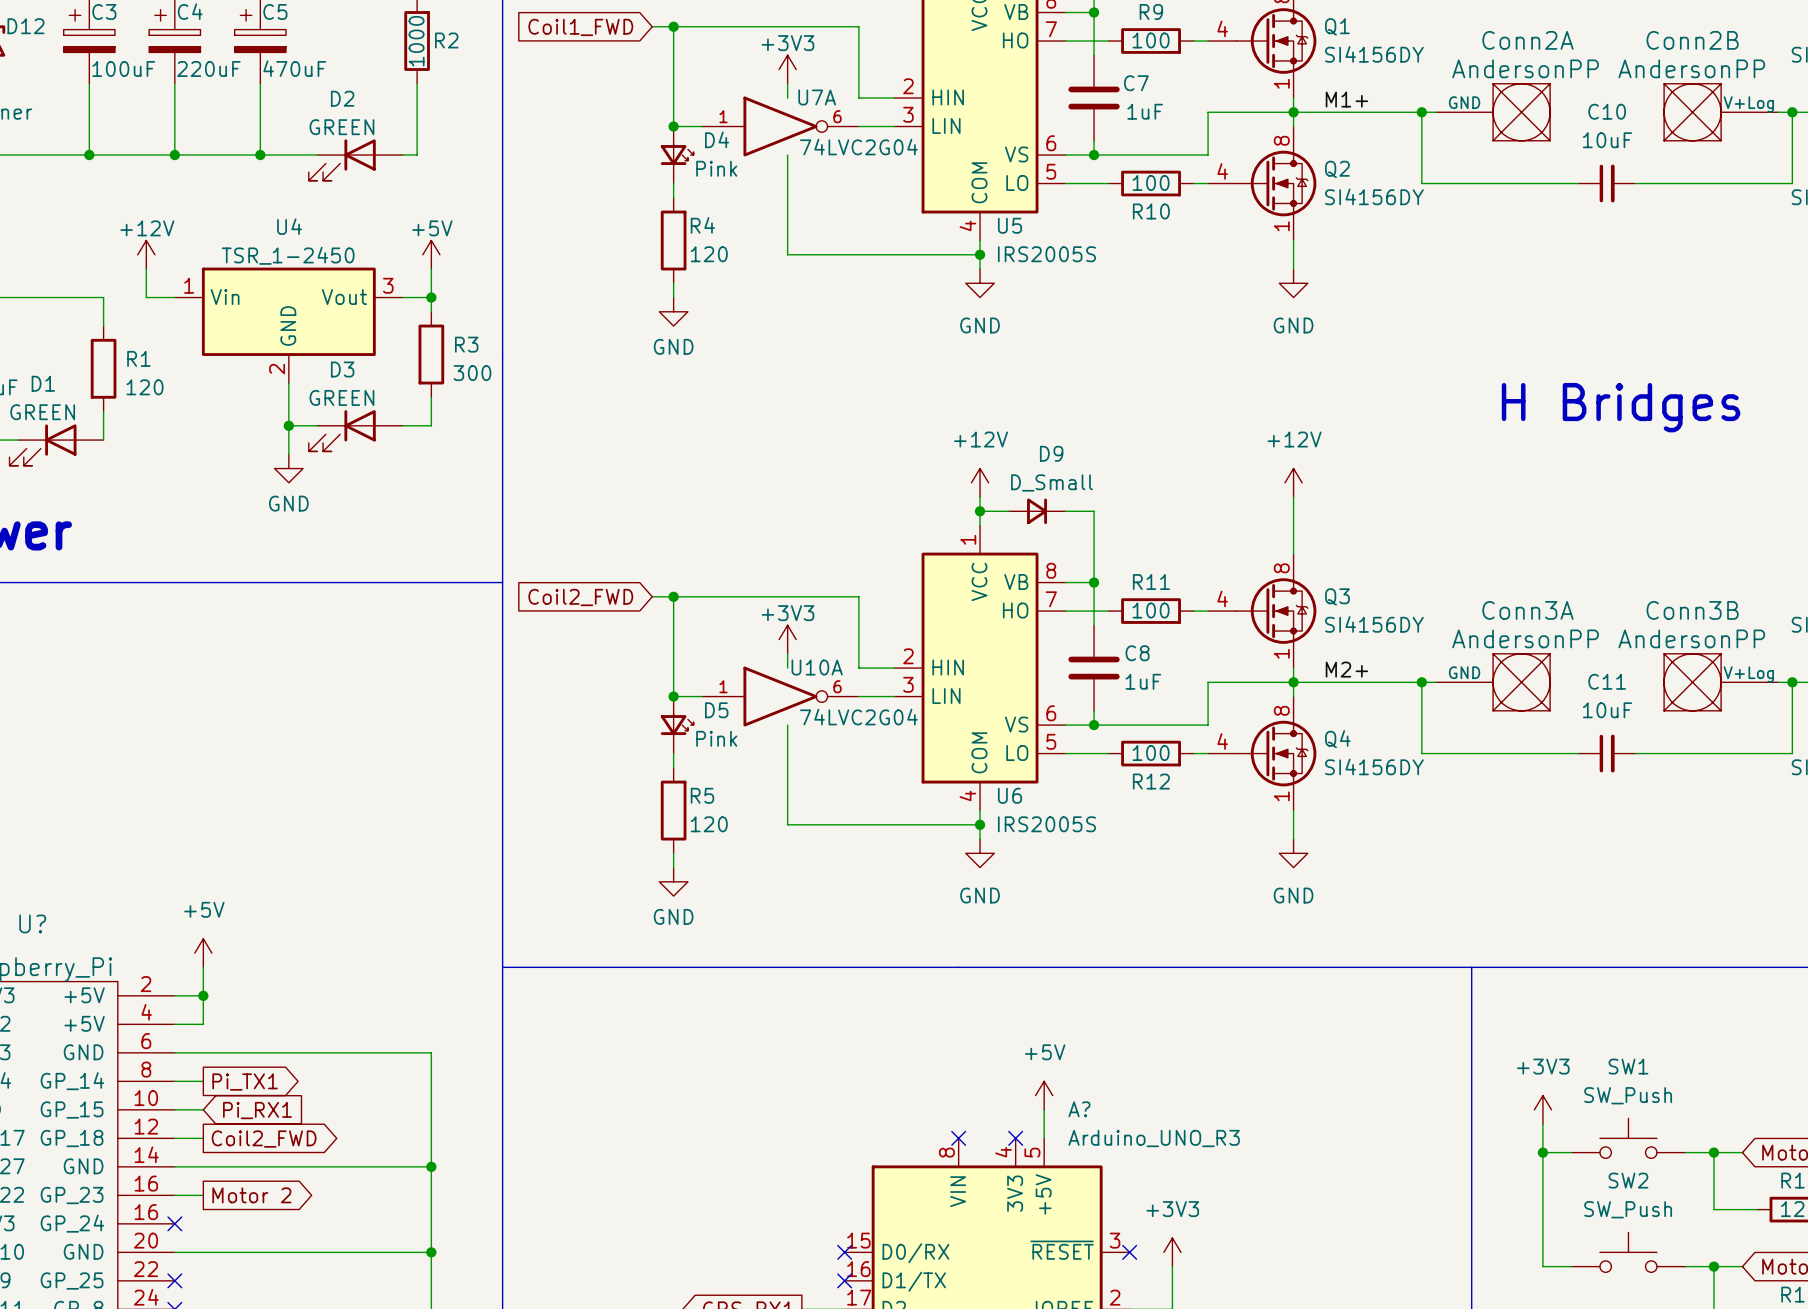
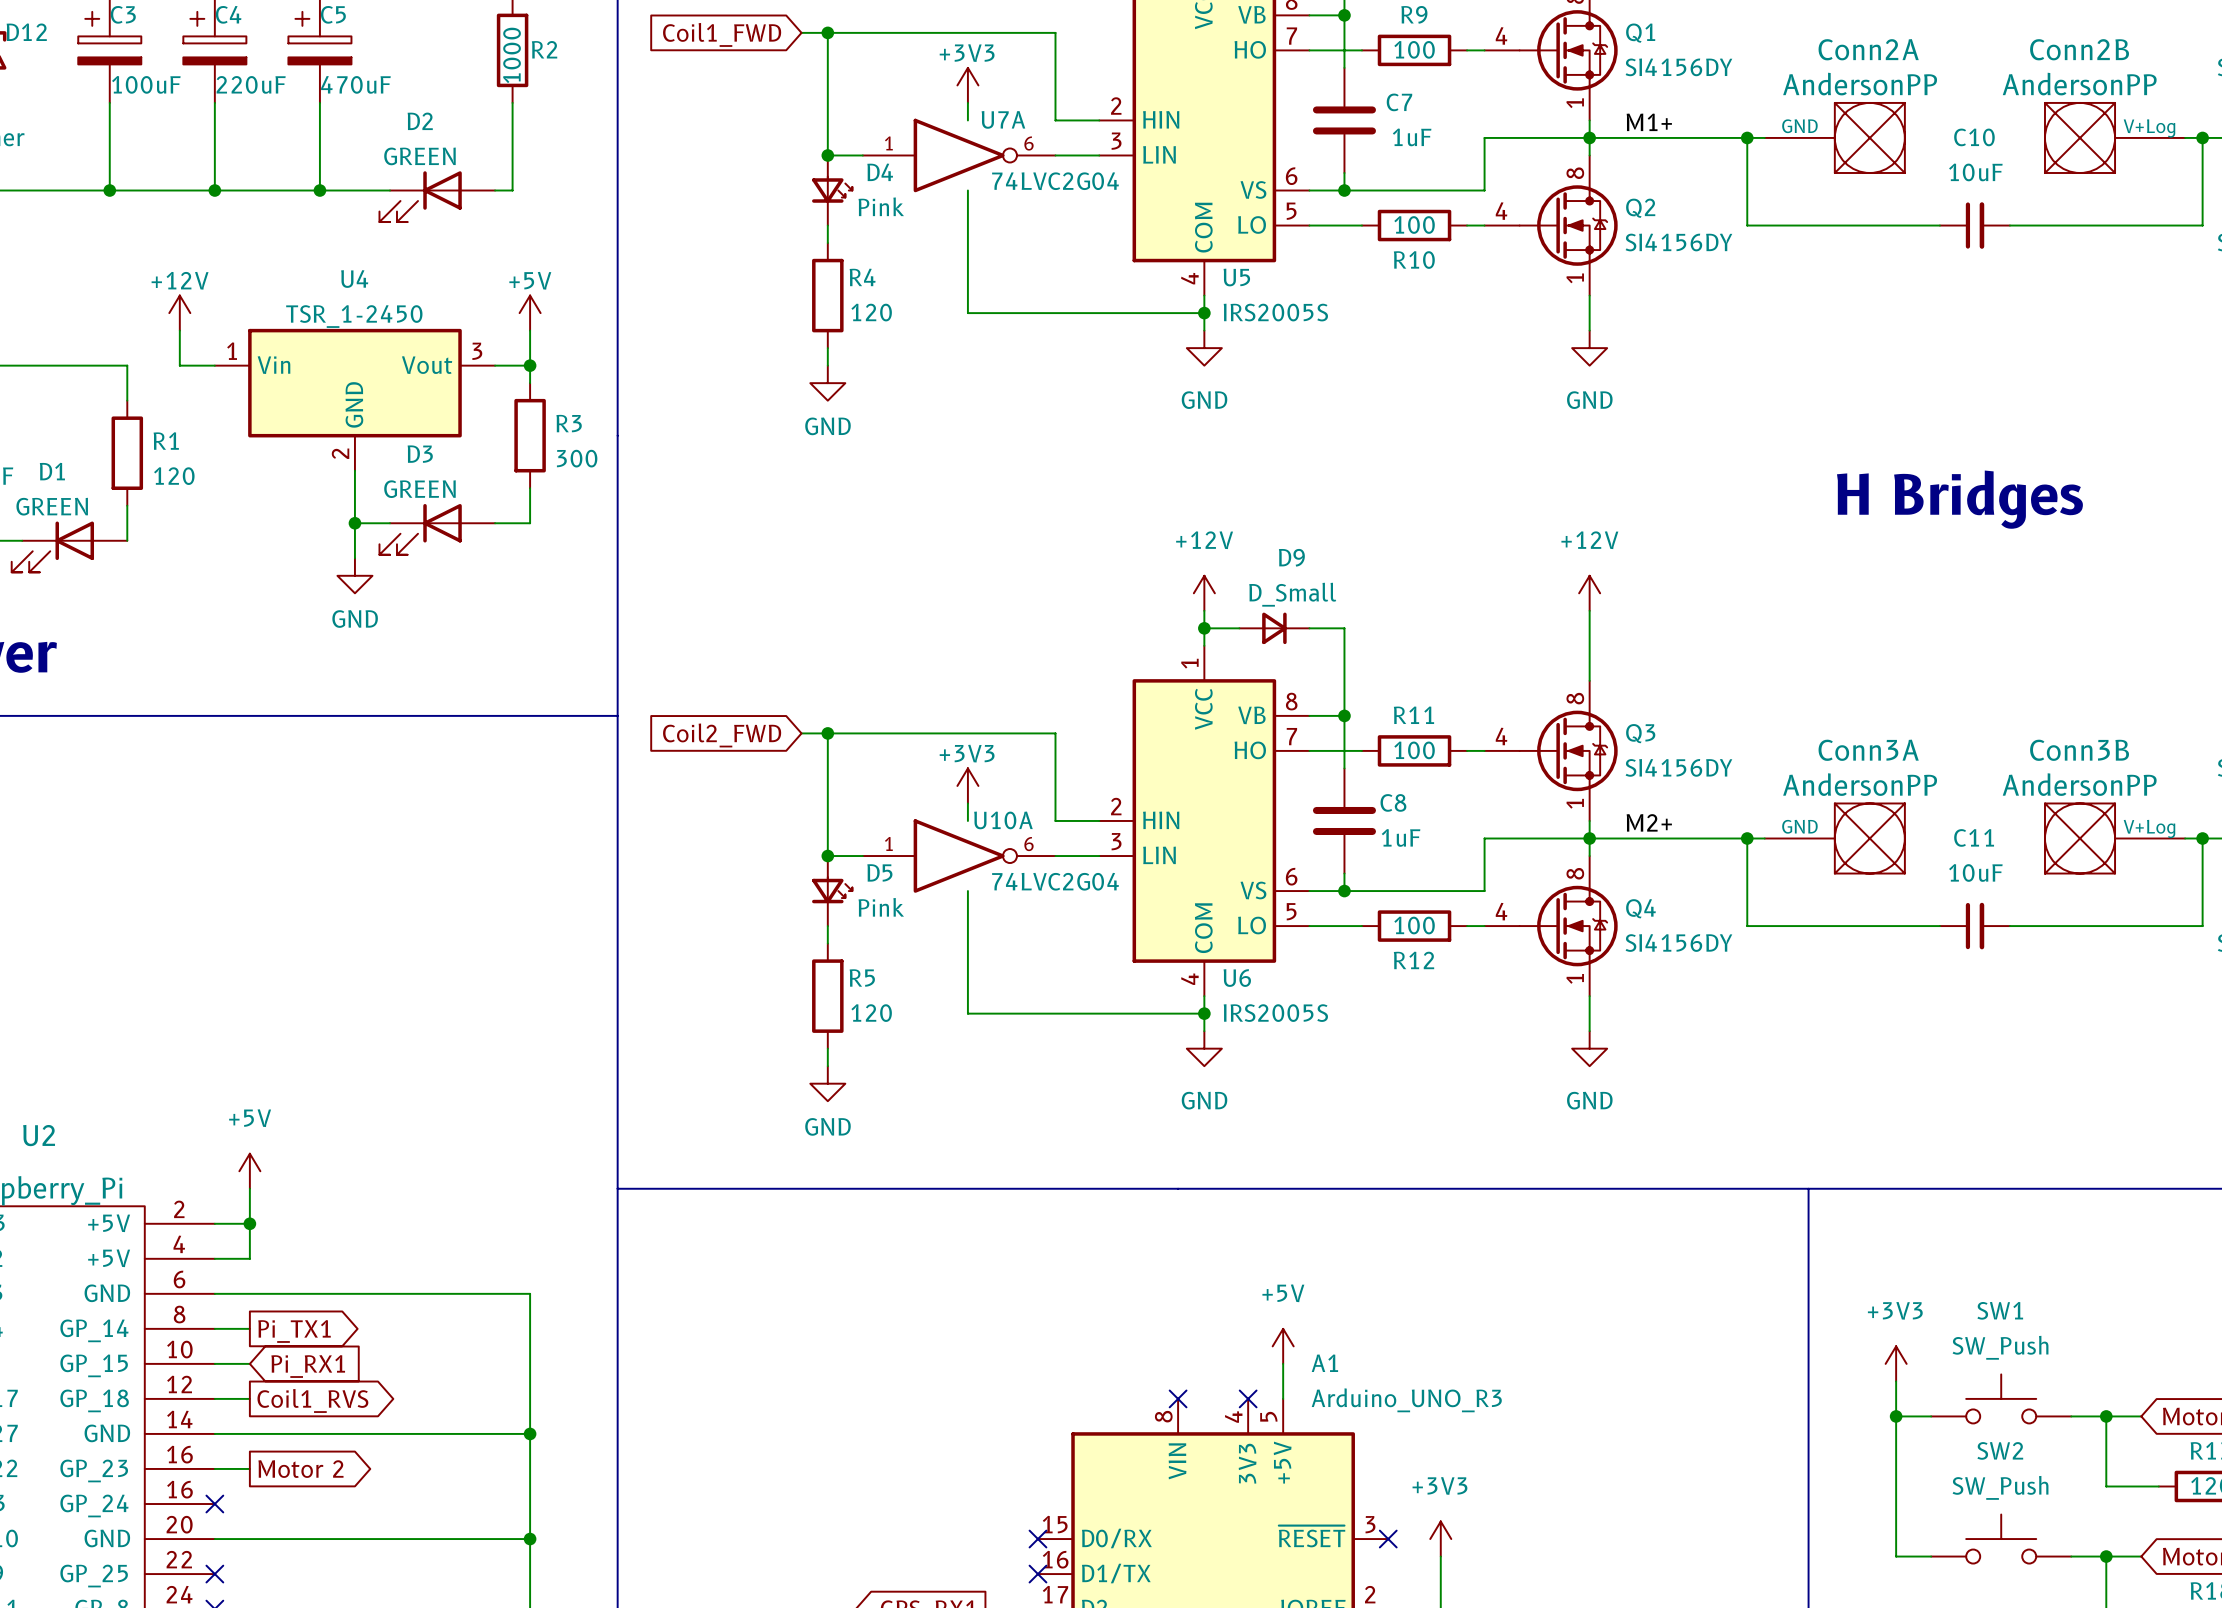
U? name: U? (32, 923) -> U2 (39, 1135)
A? name: A? (1079, 1109) -> A1 (1324, 1363)
global label: Coil2_FWD (264, 1139) -> Coil1_RVS (312, 1400)

